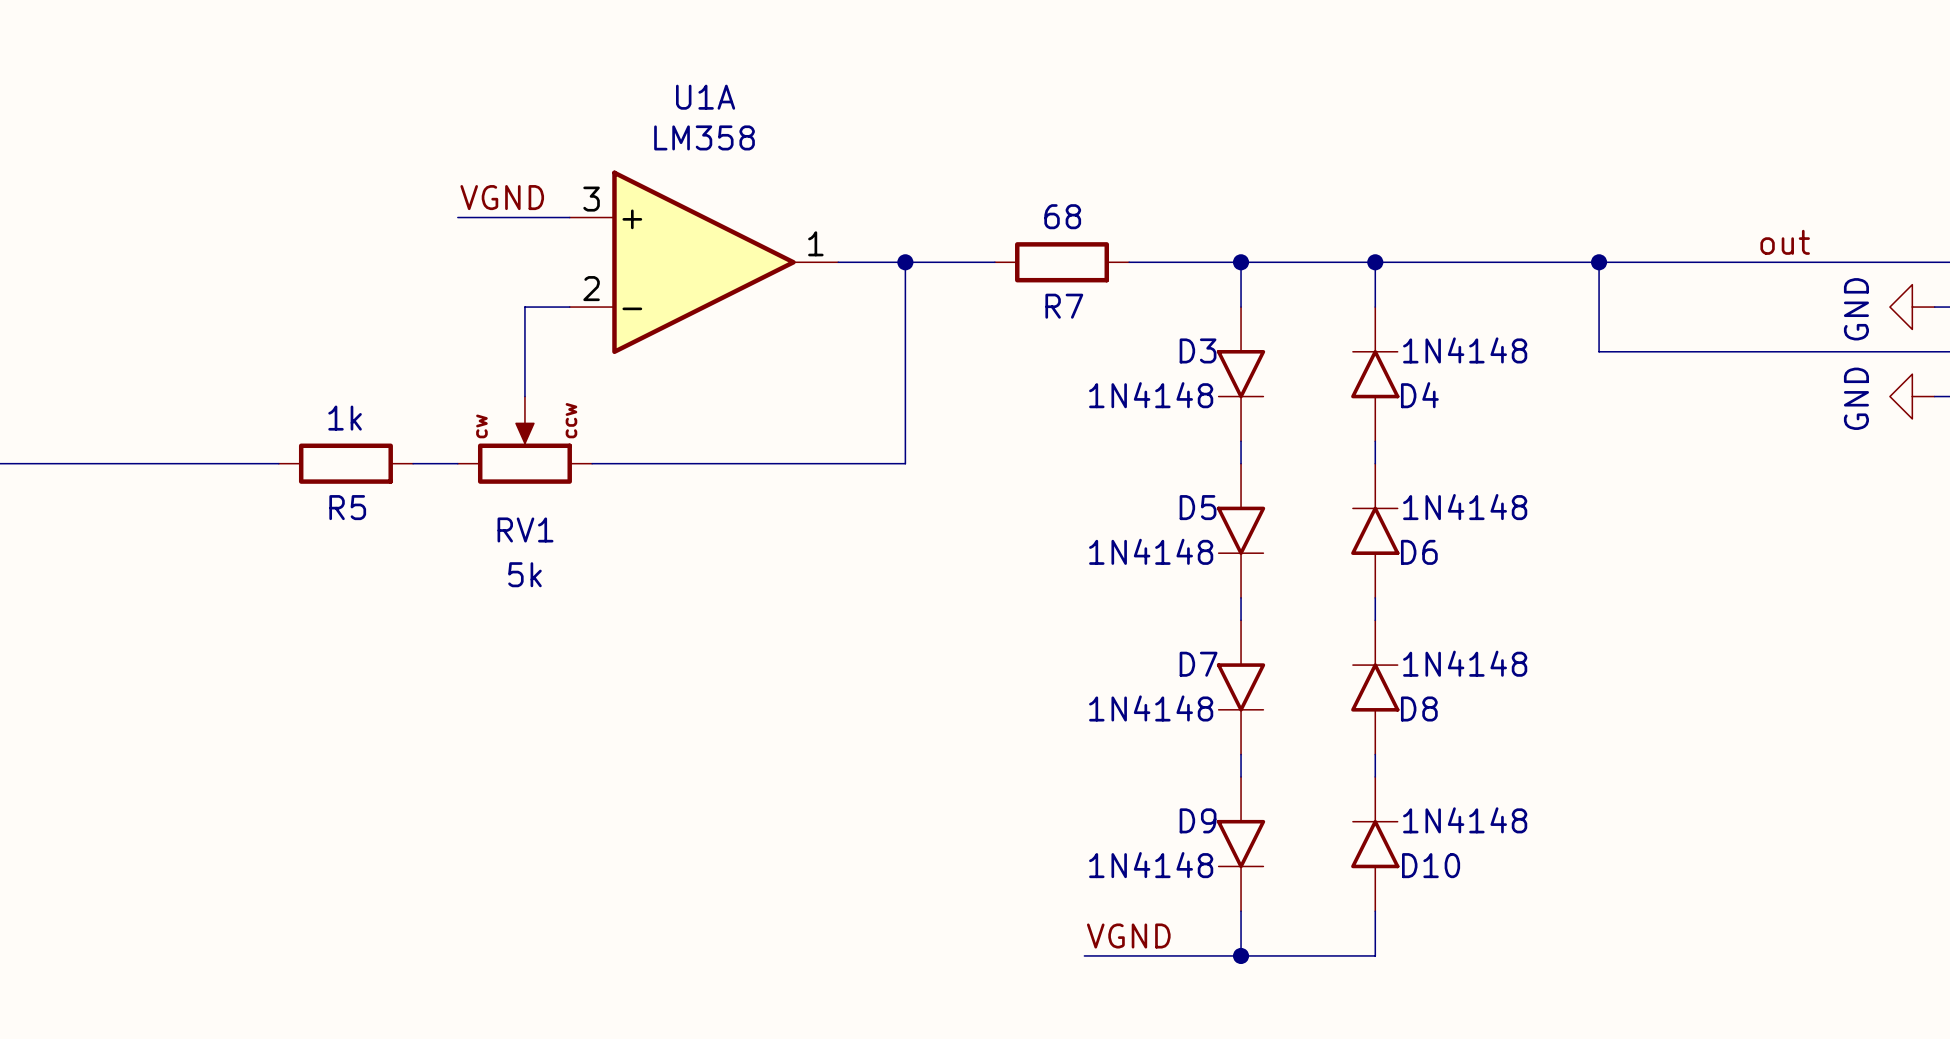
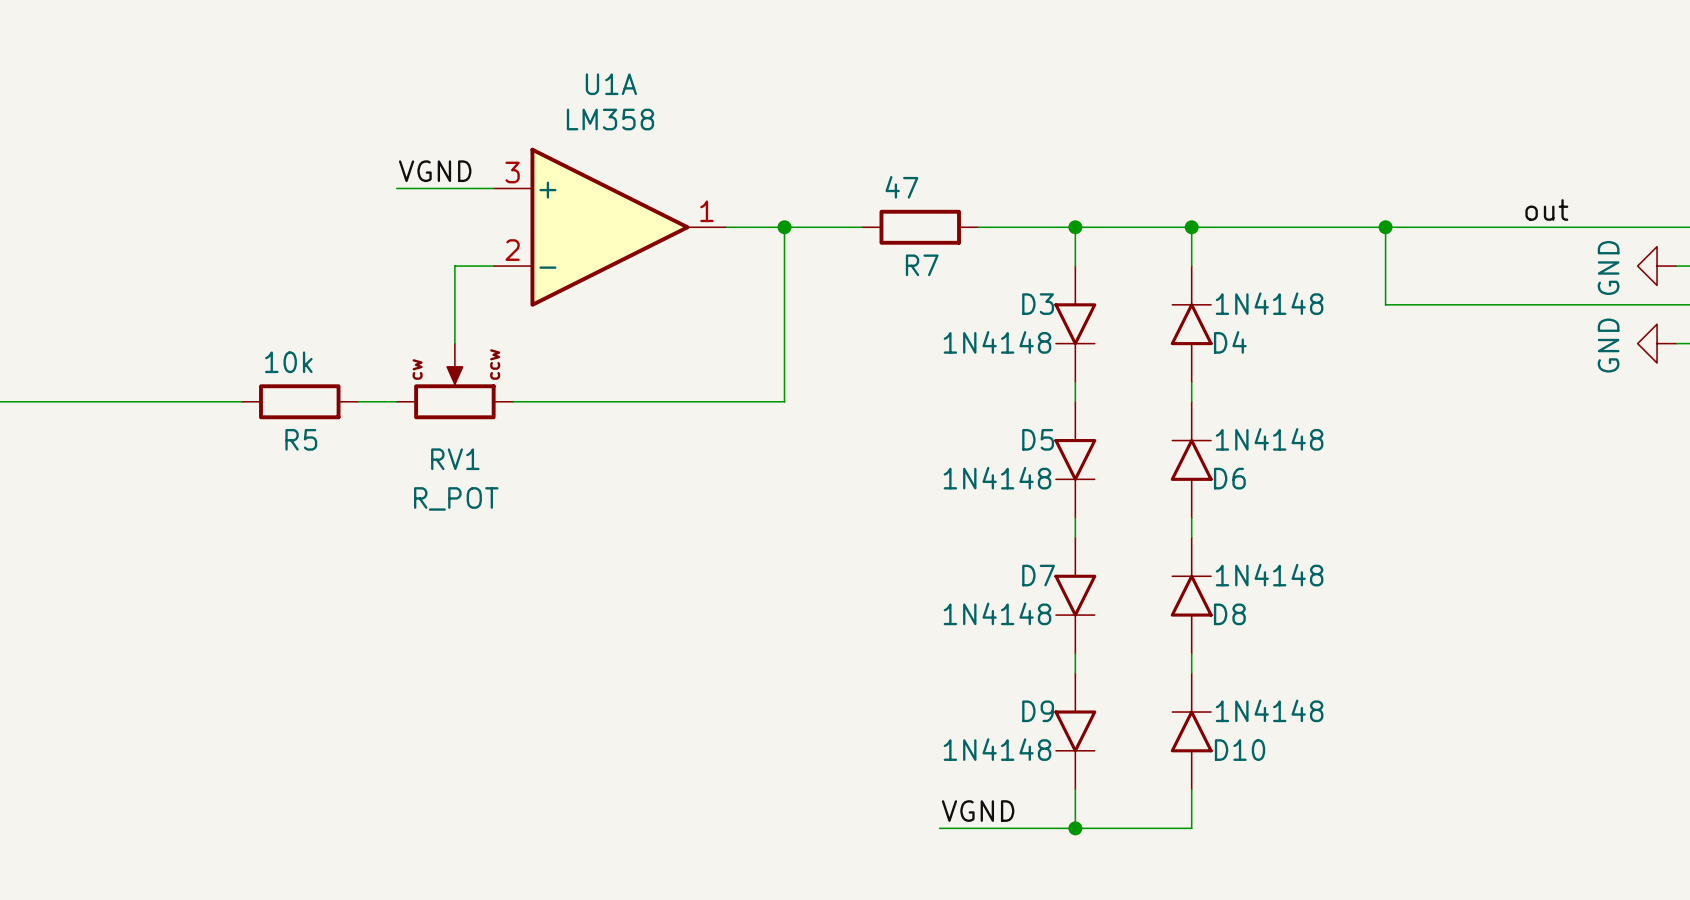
R7 value: 68 (1062, 216) -> 47 (901, 187)
R5 value: 1k (345, 418) -> 10k (288, 362)
RV1 value: 5k (524, 574) -> R_POT (456, 498)

